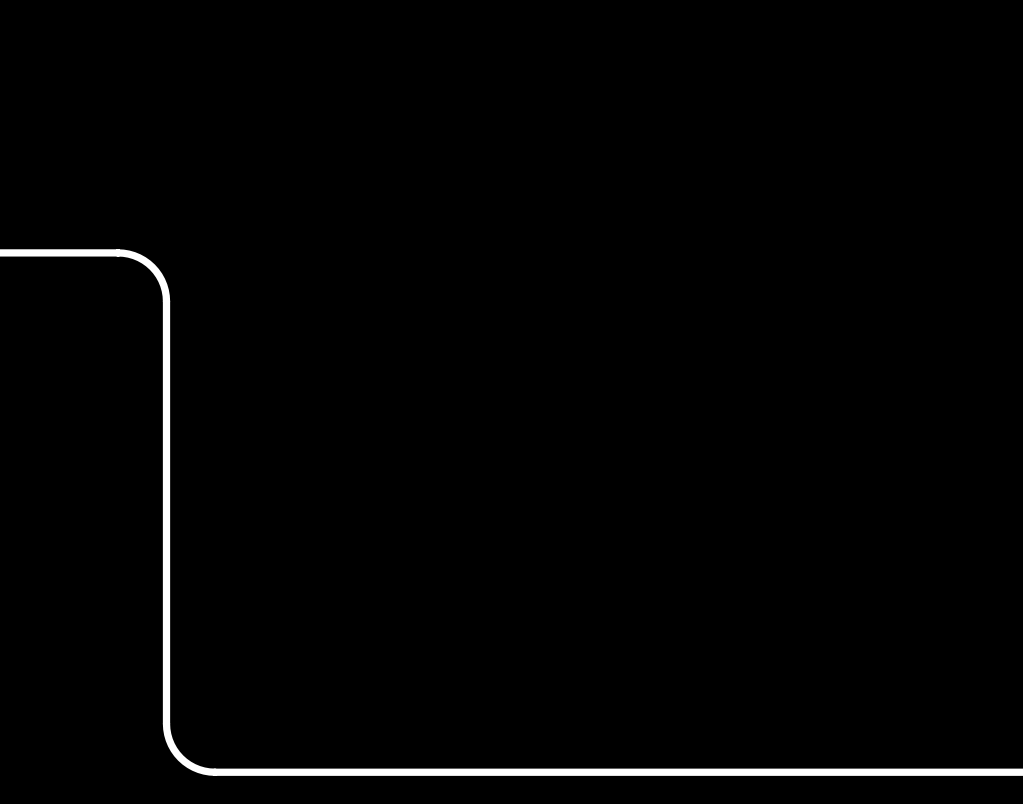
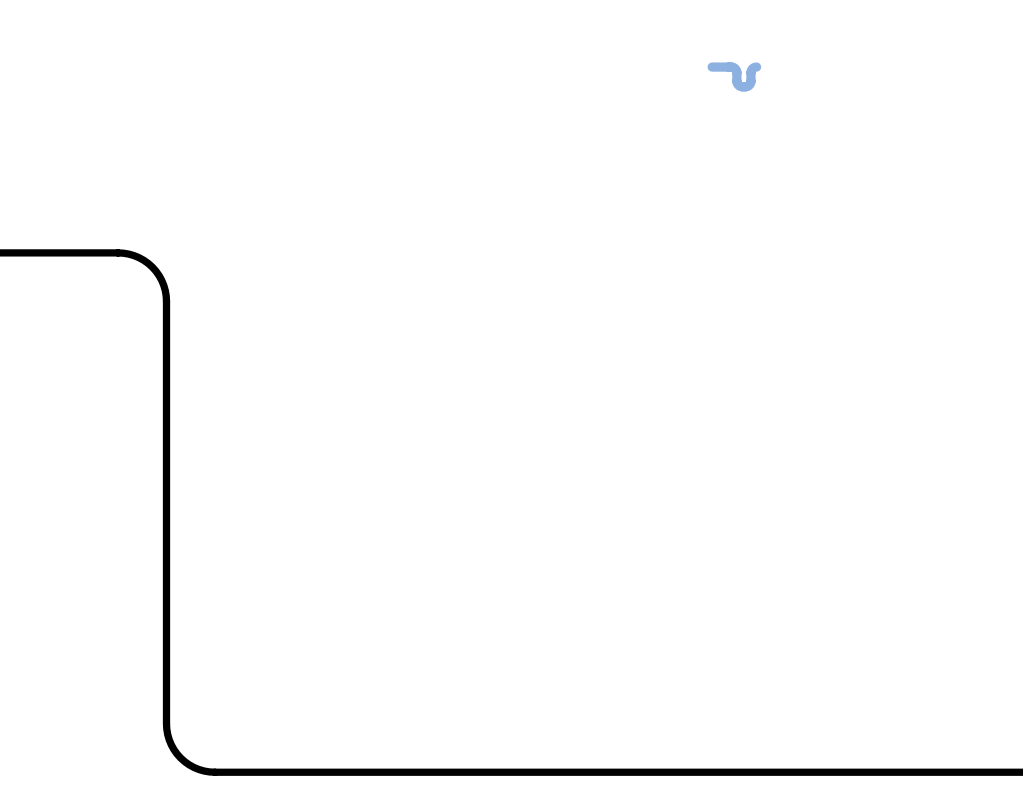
track: none -> (756, 67) (751, 70) (750, 84) (745, 86) (737, 84) (736, 71) (734, 67) (712, 67)

